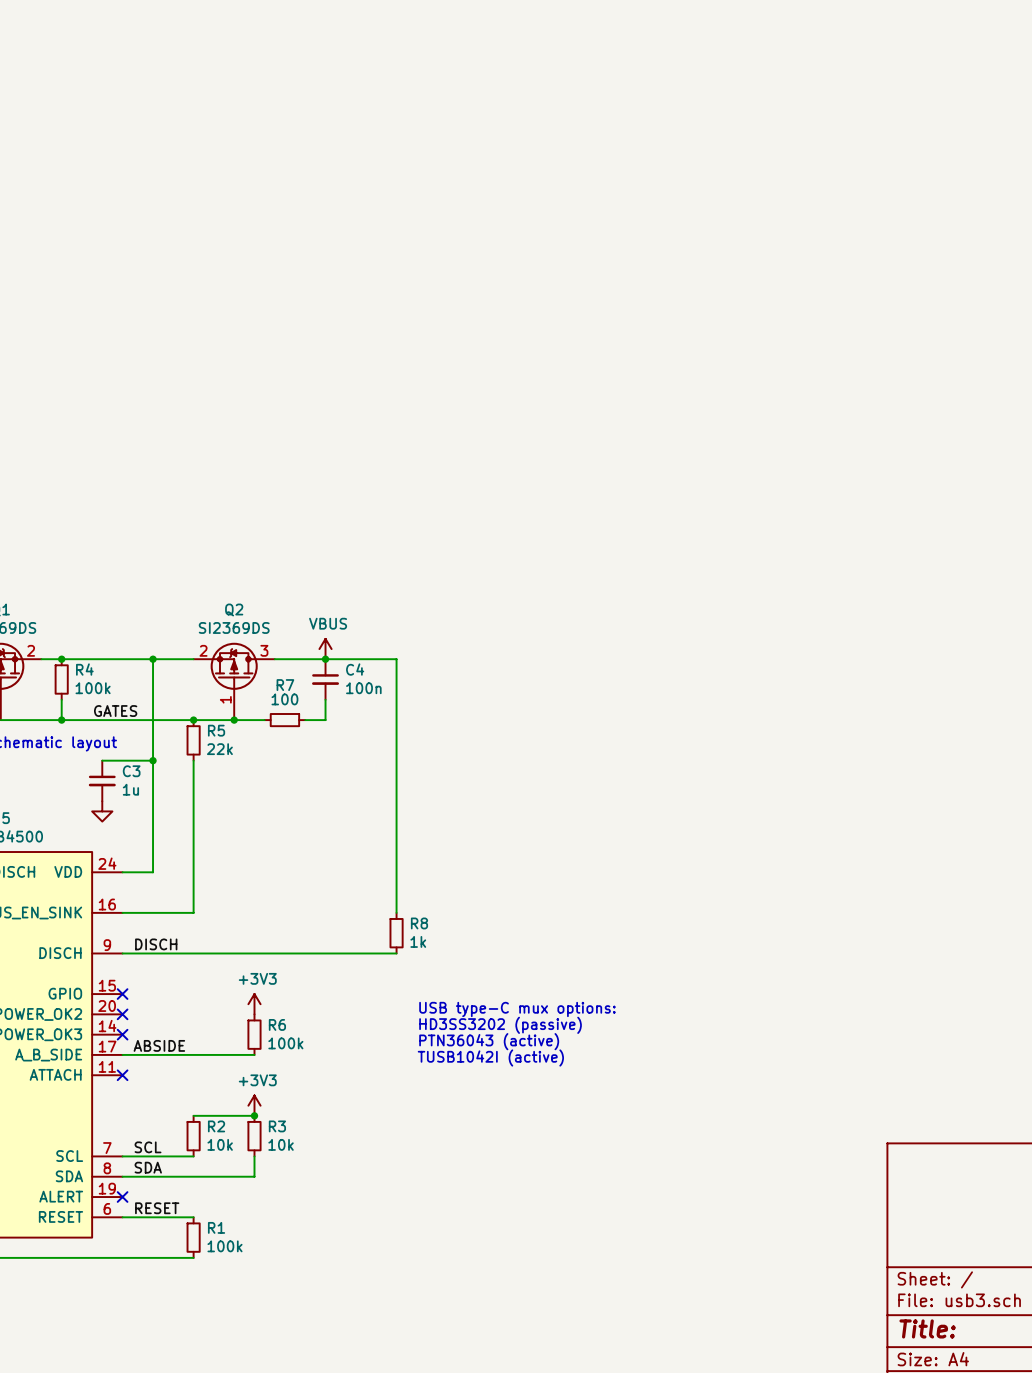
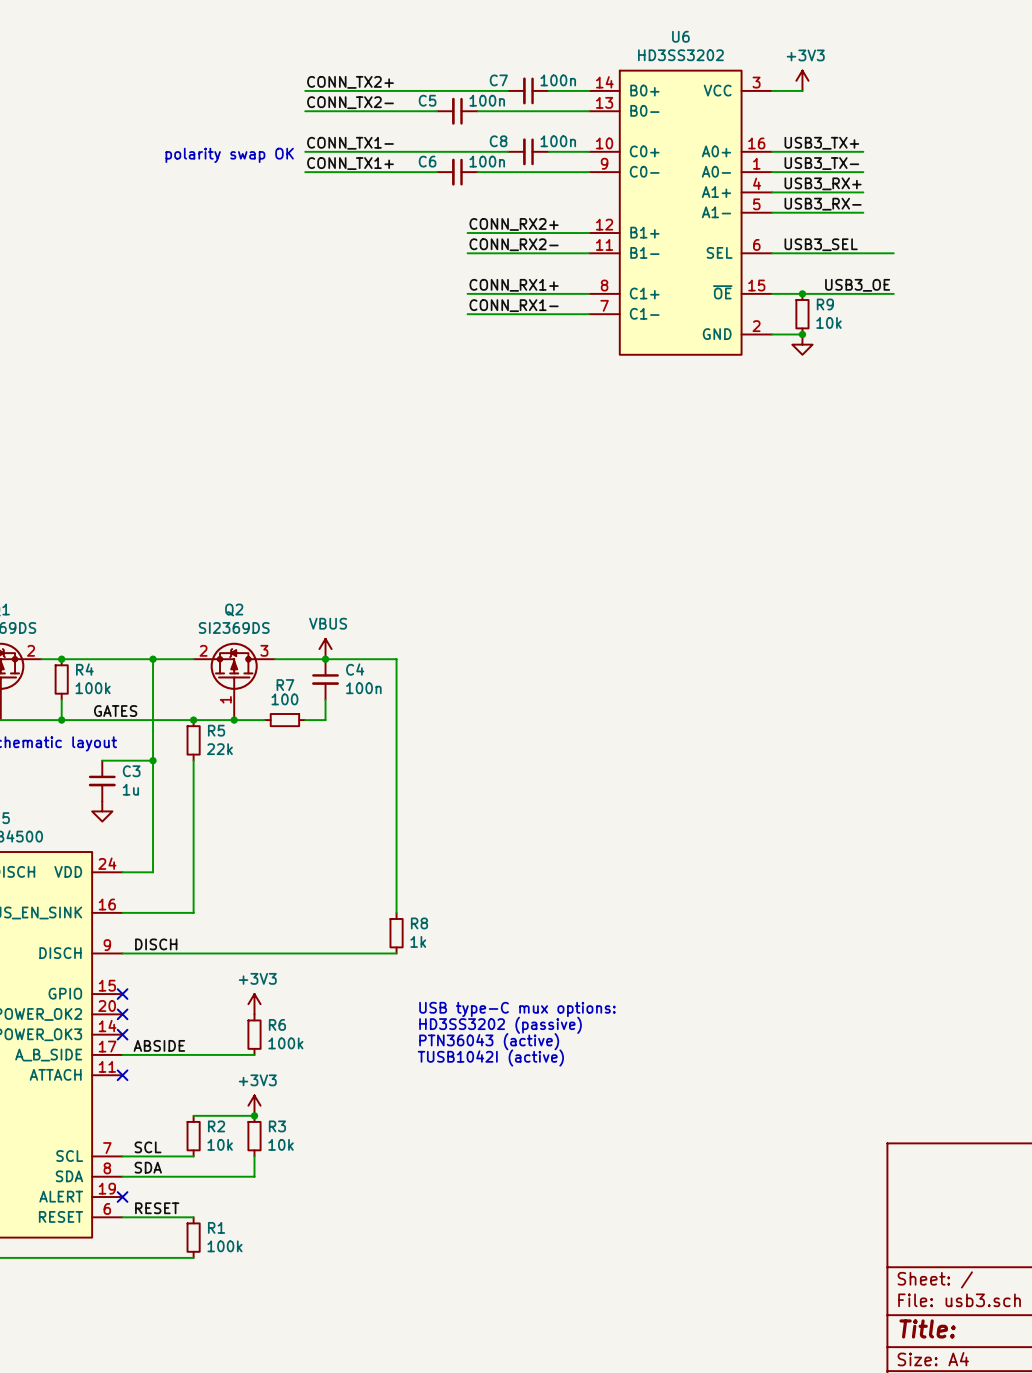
power symbol: none -> +3V3 (802, 80)
label: none -> CONN_TX2+ (350, 82)
wire: none -> (305, 90) (508, 90)
C7: none -> 100n (528, 90)
wire: none -> (548, 90) (589, 90)
wire: none -> (772, 90) (802, 90)
label: none -> CONN_TX2- (350, 102)
wire: none -> (305, 111) (437, 111)
C5: none -> 100n (457, 111)
wire: none -> (477, 111) (589, 111)
label: none -> CONN_TX1- (350, 143)
label: none -> USB3_TX+ (821, 143)
wire: none -> (305, 151) (508, 151)
C8: none -> 100n (528, 151)
wire: none -> (548, 151) (589, 151)
wire: none -> (772, 151) (863, 151)
text: none -> polarity swap OK (229, 155)
label: none -> CONN_TX1+ (350, 163)
label: none -> USB3_TX- (821, 163)
wire: none -> (305, 172) (437, 172)
C6: none -> 100n (457, 172)
wire: none -> (477, 172) (589, 172)
wire: none -> (772, 172) (863, 172)
label: none -> USB3_RX+ (823, 183)
wire: none -> (772, 192) (863, 192)
label: none -> USB3_RX- (823, 204)
U6: none -> HD3SS3202 (680, 212)
wire: none -> (772, 212) (863, 212)
label: none -> CONN_RX2+ (514, 224)
wire: none -> (467, 233) (589, 233)
label: none -> CONN_RX2- (514, 244)
label: none -> USB3_SEL (821, 244)
wire: none -> (467, 253) (589, 253)
wire: none -> (772, 253) (893, 253)
label: none -> CONN_RX1+ (514, 285)
label: none -> USB3_OE (857, 285)
wire: none -> (467, 293) (589, 293)
wire: none -> (772, 293) (893, 293)
junction: none -> (802, 293)
label: none -> CONN_RX1- (514, 305)
wire: none -> (467, 314) (589, 314)
R9: none -> 10k (802, 314)
wire: none -> (772, 334) (802, 334)
junction: none -> (802, 334)
power symbol: none -> (802, 344)

